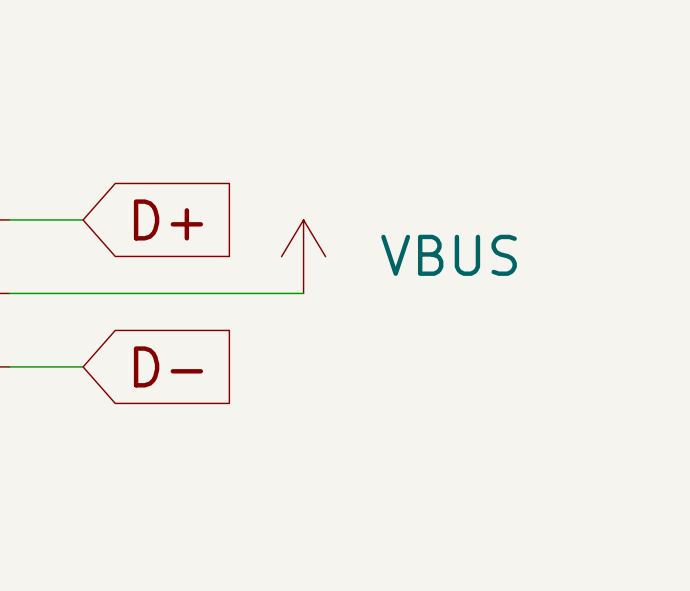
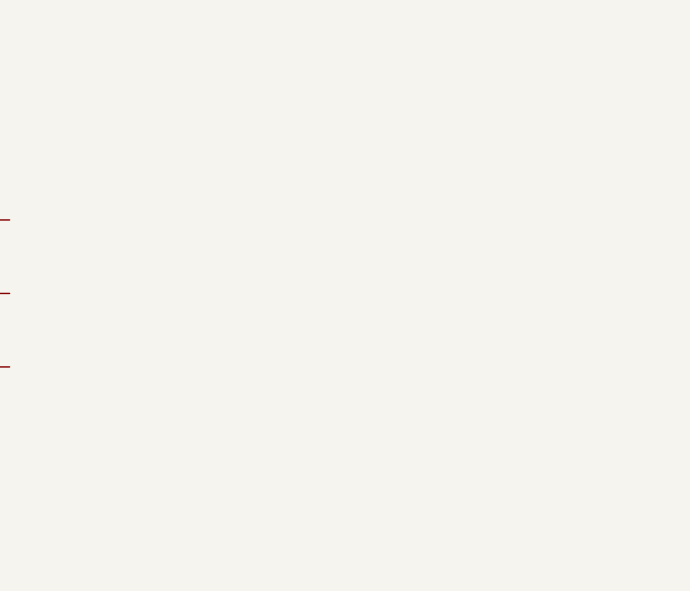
wire: (9, 219) (83, 219) -> none
global label: D+ (168, 219) -> none
power symbol: VBUS (303, 256) -> none
wire: (9, 293) (303, 293) -> none
wire: (9, 366) (83, 366) -> none
global label: D- (168, 366) -> none

